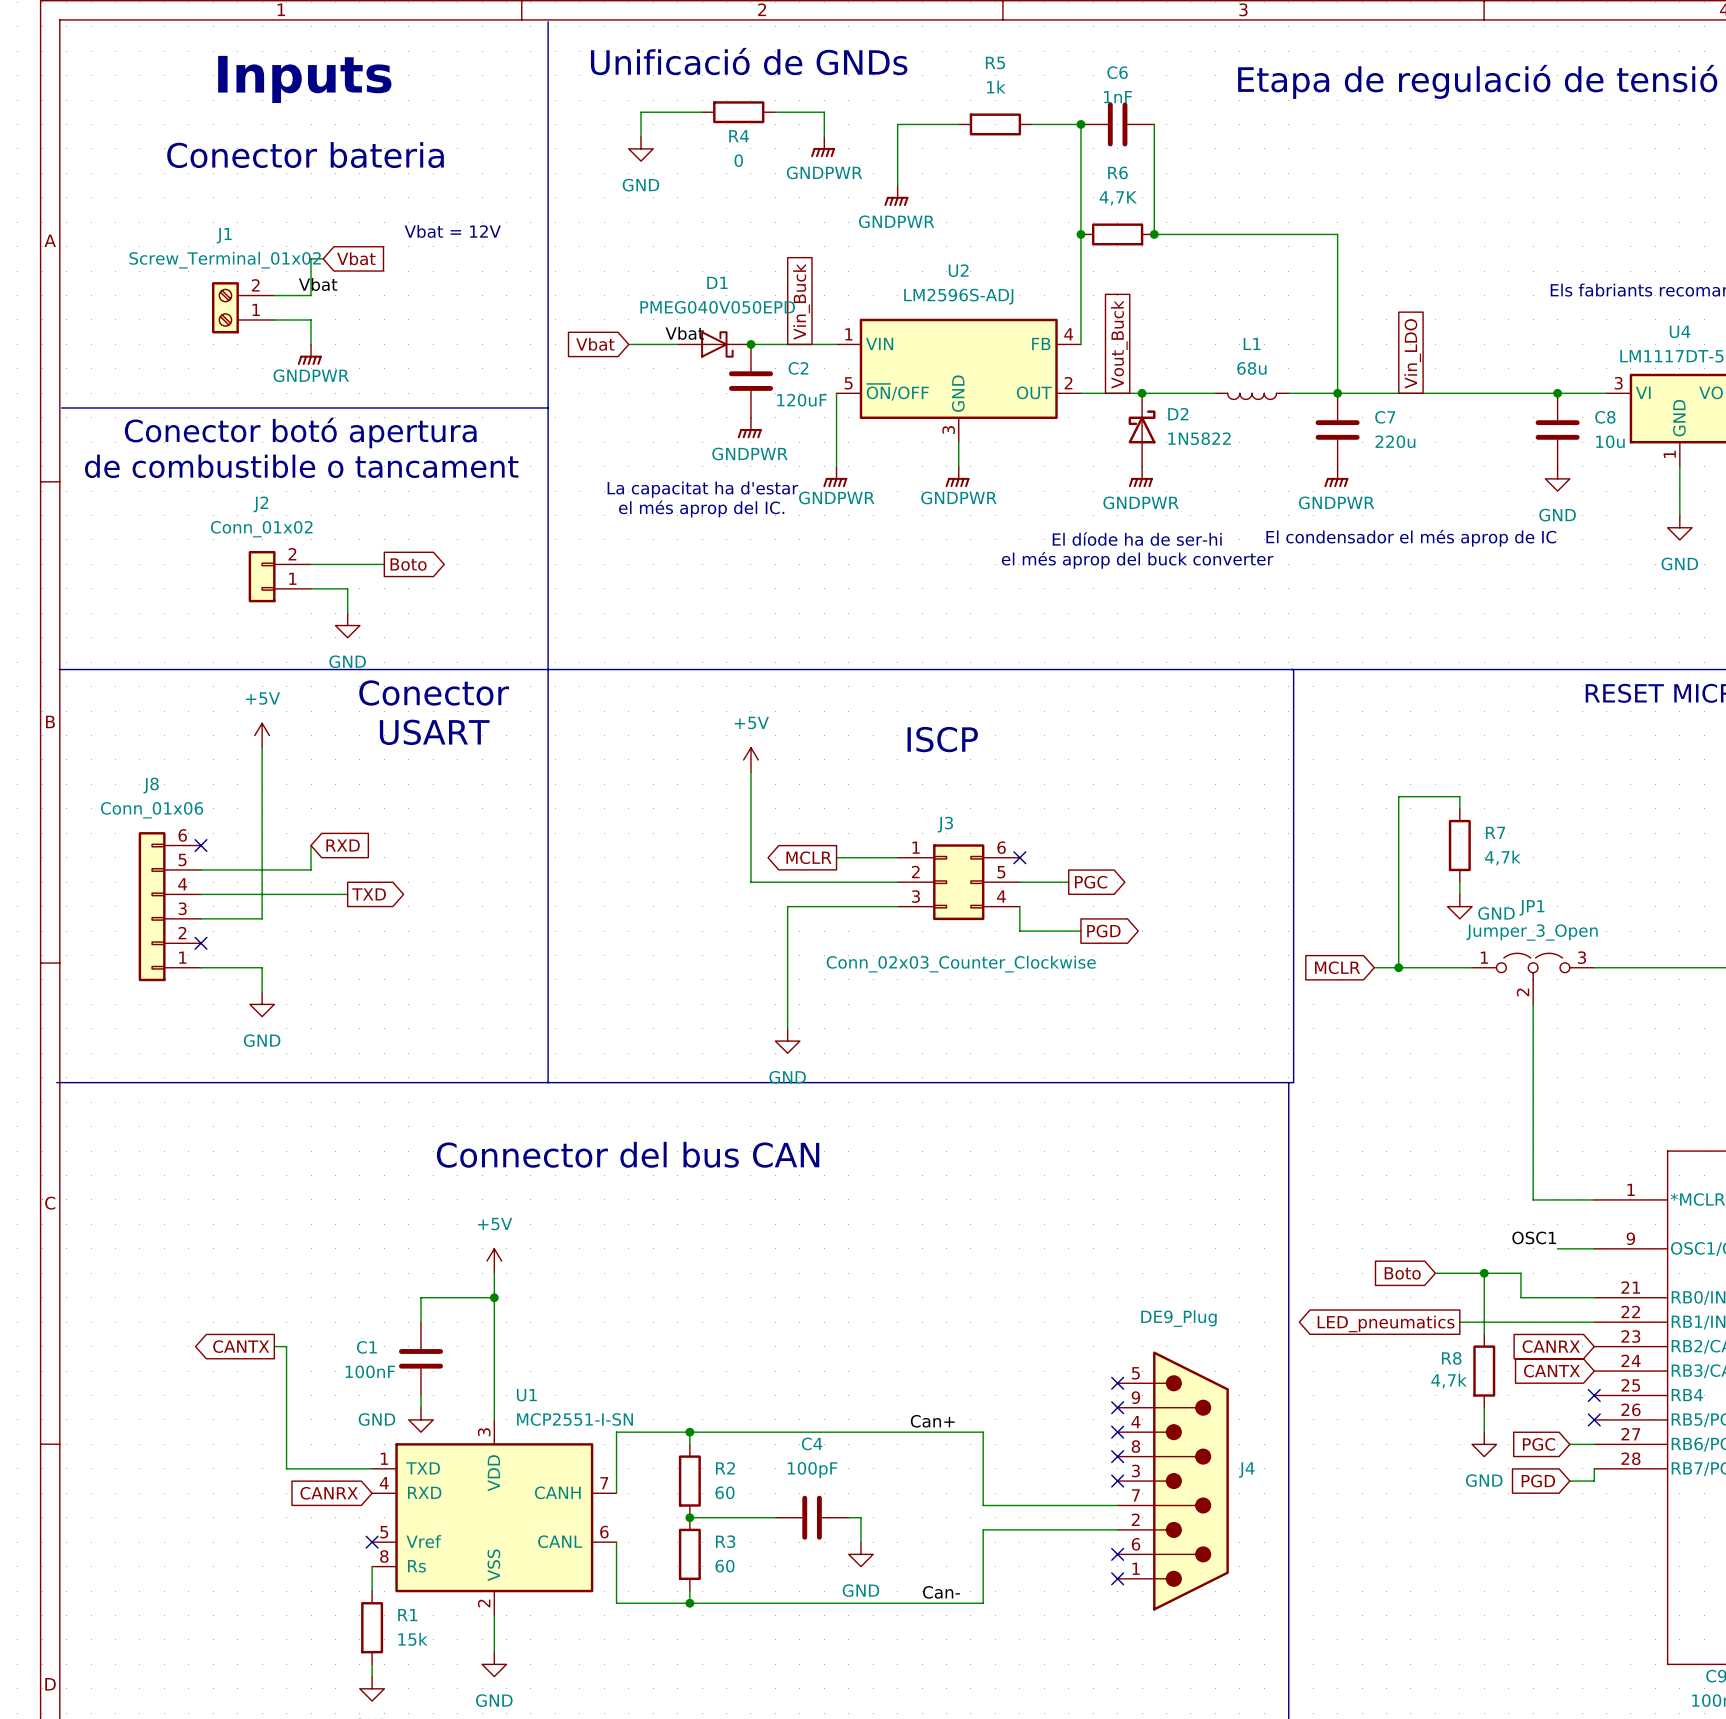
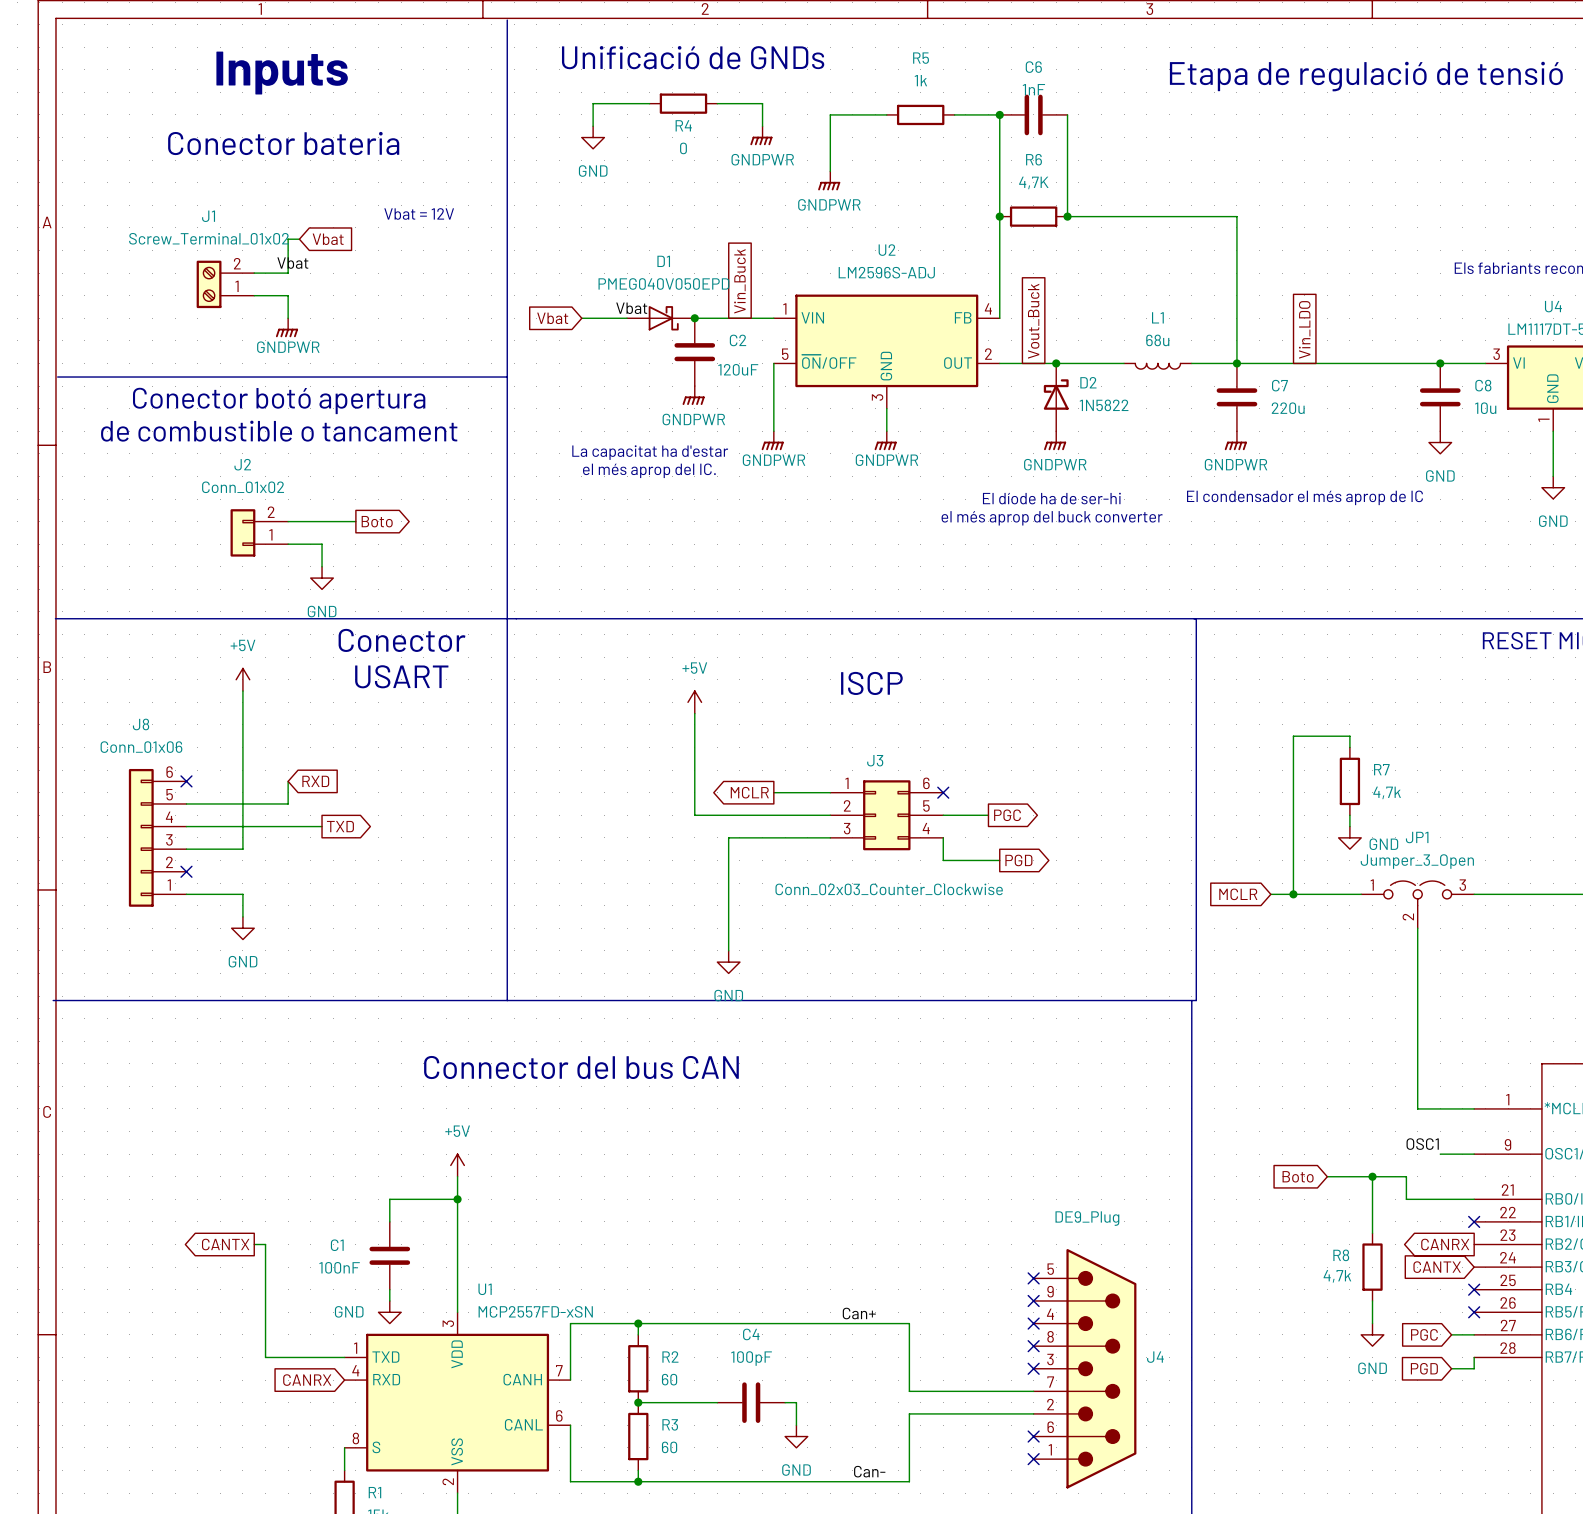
wire: (1459, 1322) (1594, 1322) -> none
no-connect mark: none -> (1474, 1221)
global label: LED_pneumatics (1386, 1323) -> none
global label shape: input (1551, 1346) -> output (1445, 1244)
U1 symbol: [372, 1419, 617, 1616] -> [344, 1312, 571, 1494]
U1 value: MCP2551-I-SN (575, 1419) -> MCP2557FD-xSN (535, 1311)
no-connect mark: (372, 1542) -> none

